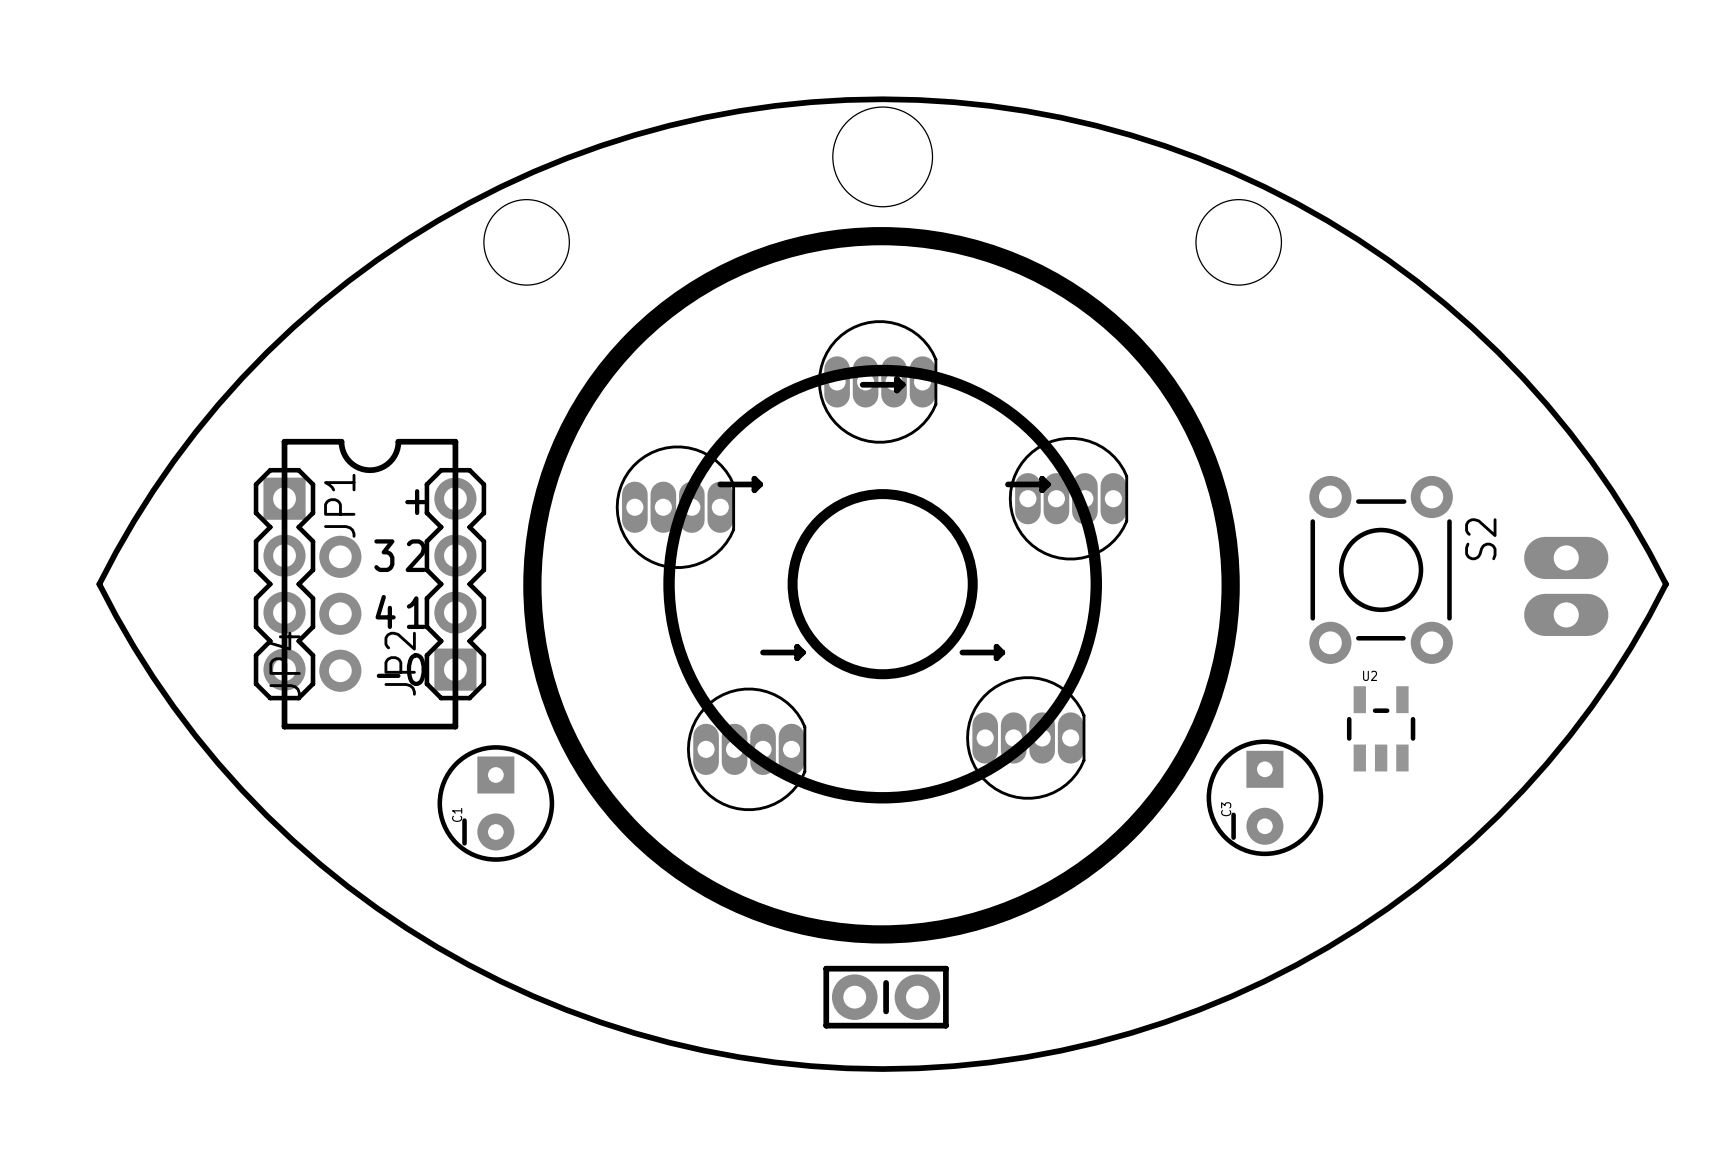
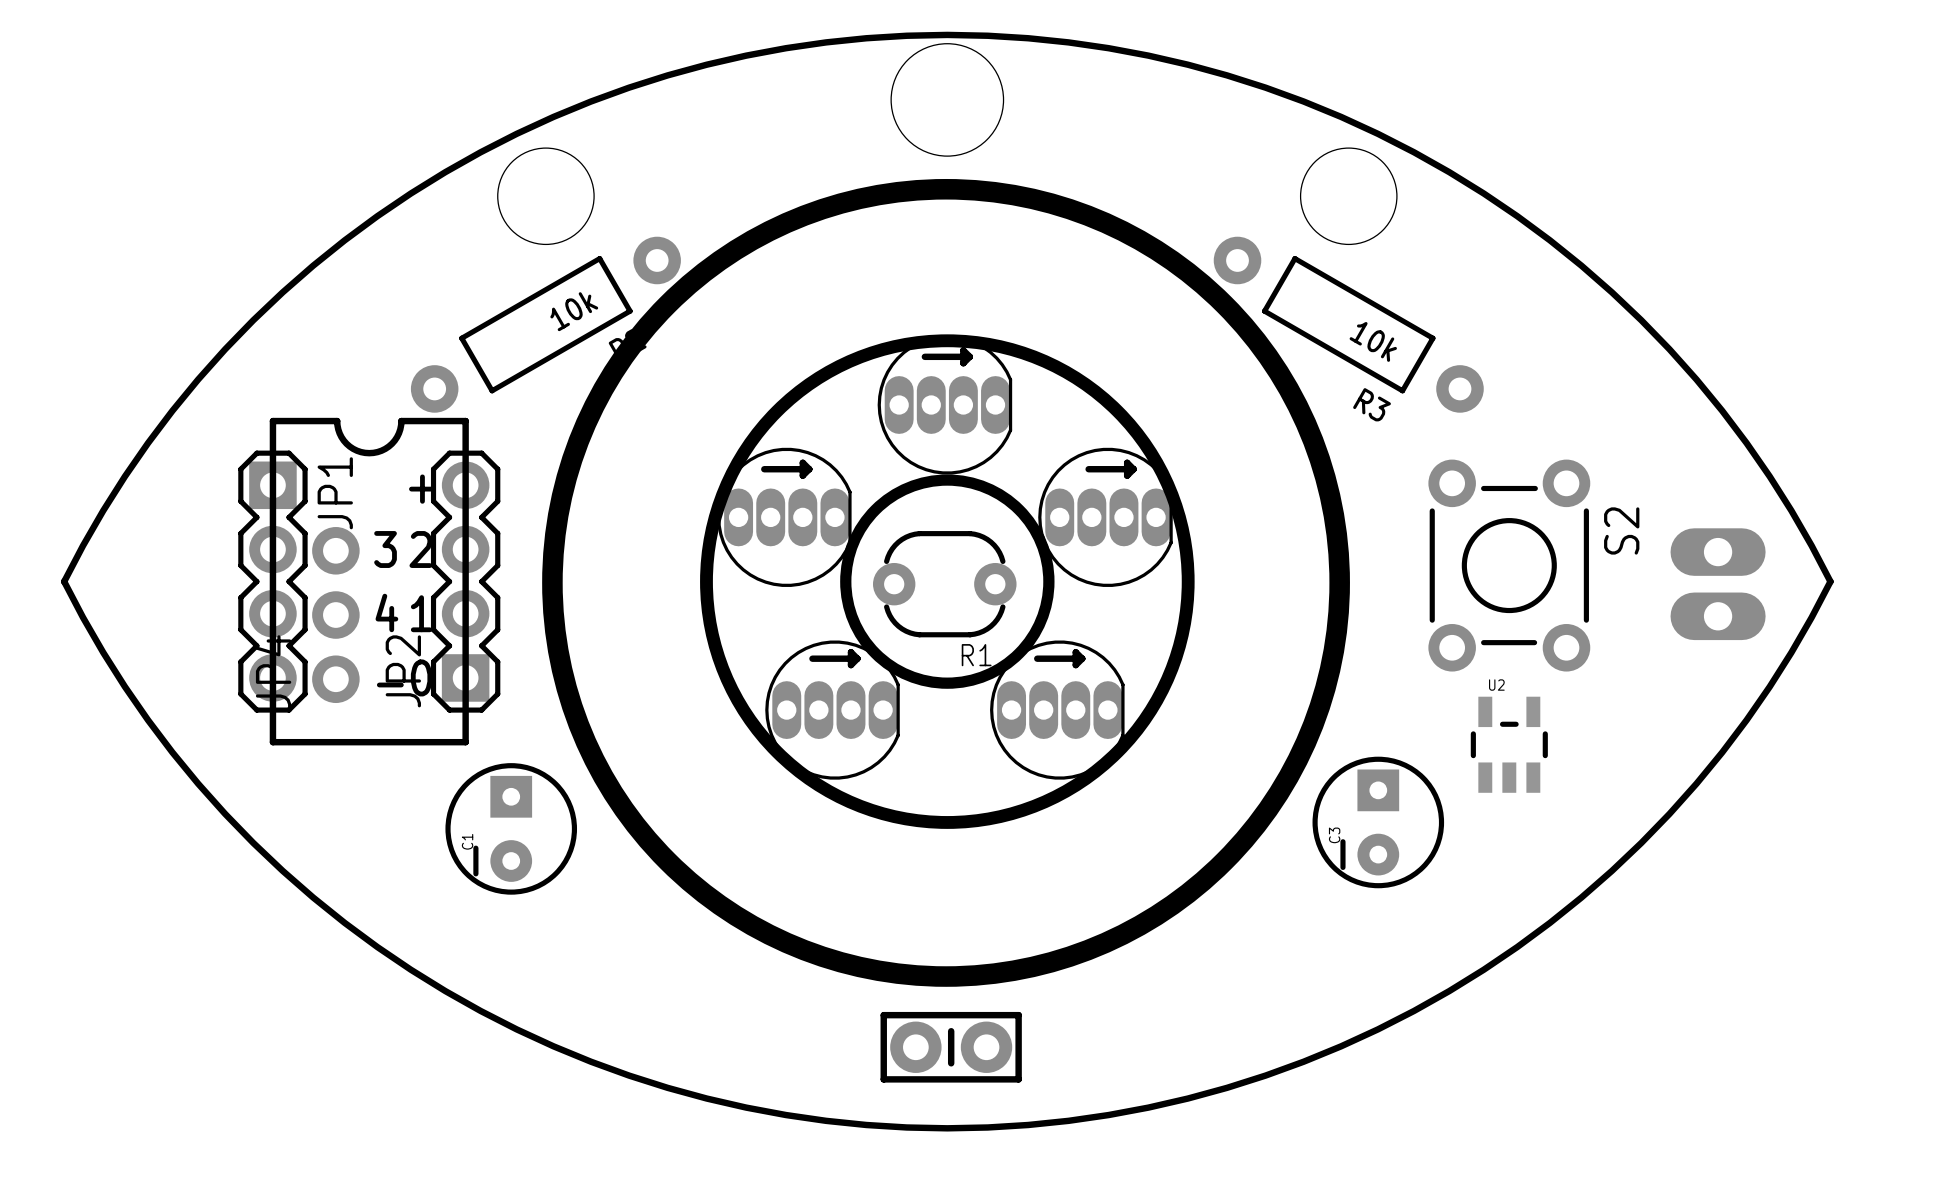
part: none -> 10k (545, 324)
R3: none -> 10k (1348, 324)
part position: (877, 381) -> (944, 404)
part position: (1068, 498) -> (1105, 517)
part position: (675, 507) -> (784, 517)
R1: none -> (944, 584)
part position: (1025, 737) -> (1057, 710)
part position: (746, 749) -> (832, 710)

